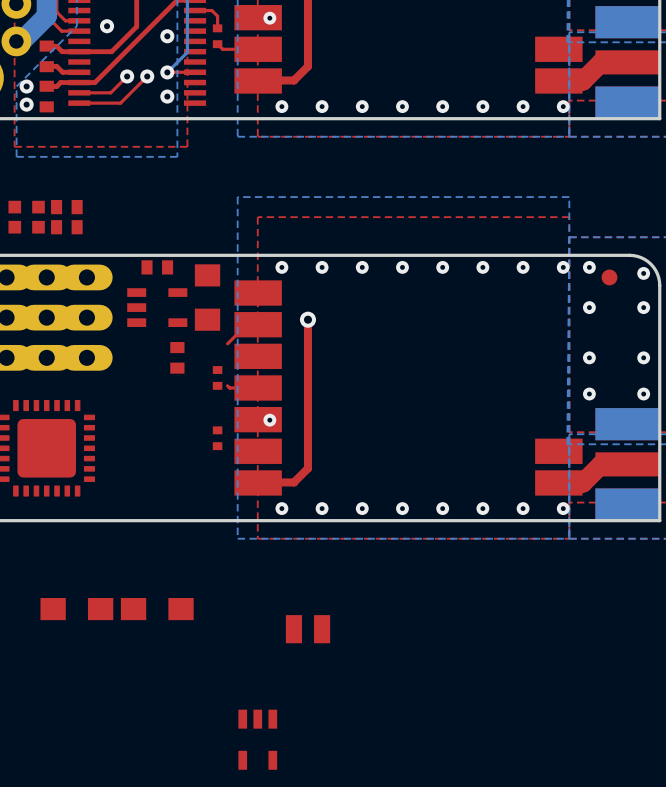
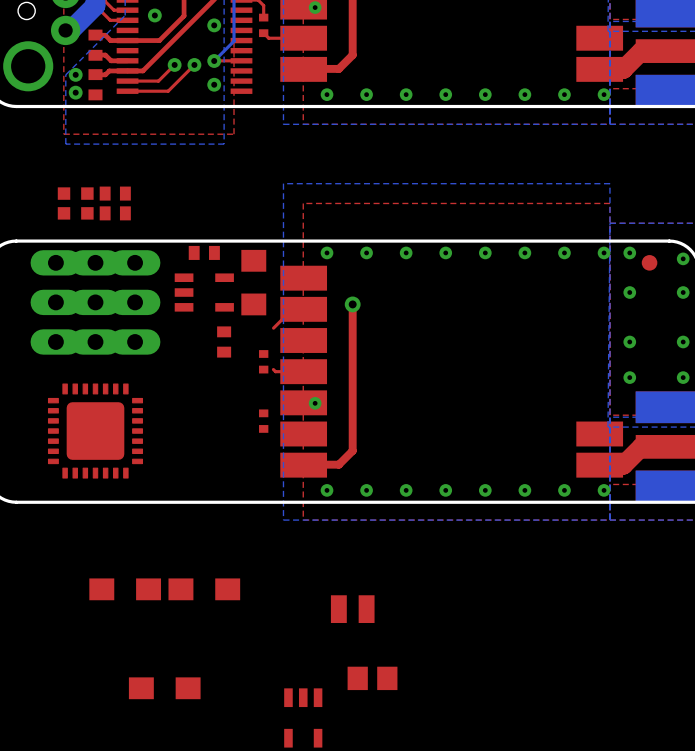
part: none -> (372, 678)
part: none -> (164, 688)

